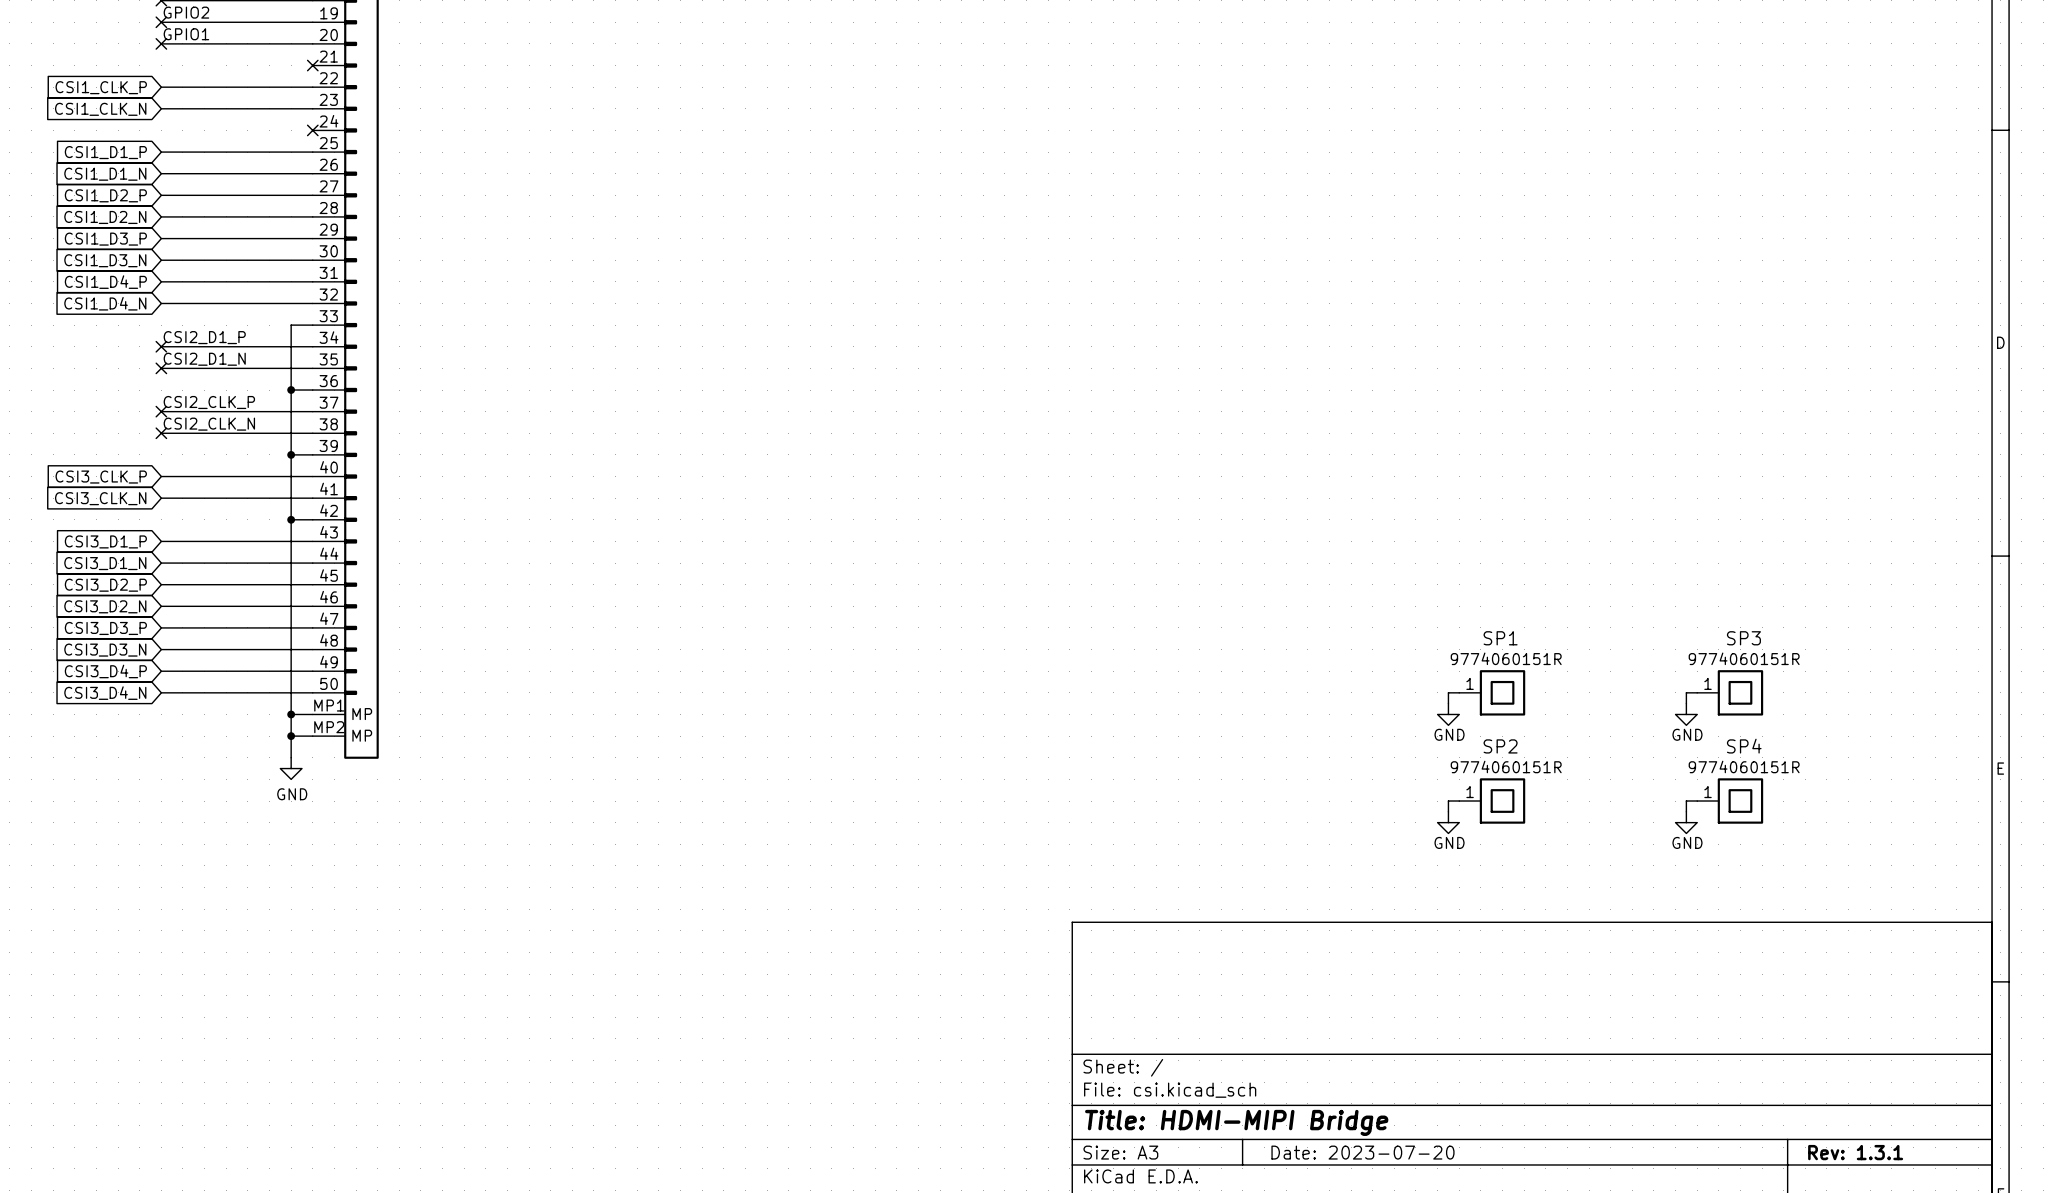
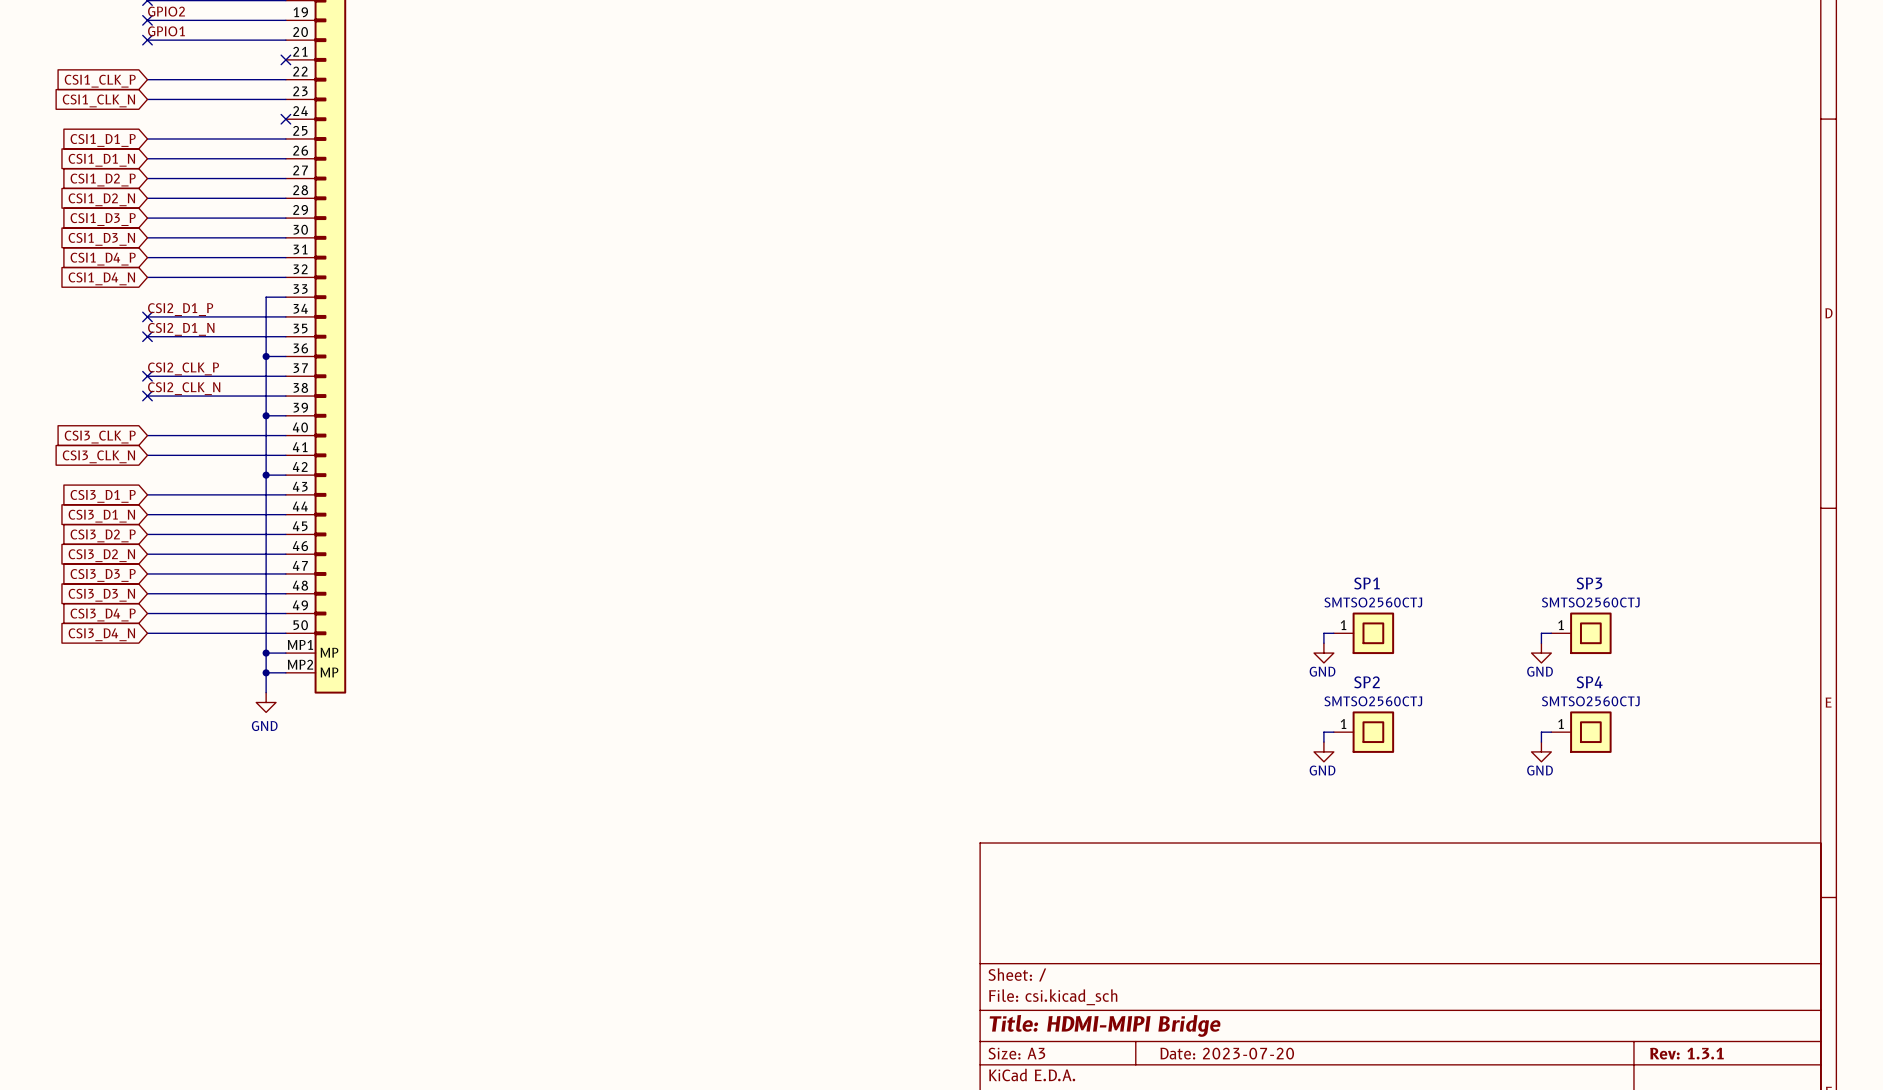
SP1 text: 9774060151R (1506, 658) -> SMTSO2560CTJ (1373, 602)
SP3 text: 9774060151R (1744, 658) -> SMTSO2560CTJ (1590, 602)
SP2 text: 9774060151R (1506, 766) -> SMTSO2560CTJ (1373, 701)
SP4 text: 9774060151R (1744, 766) -> SMTSO2560CTJ (1590, 701)

